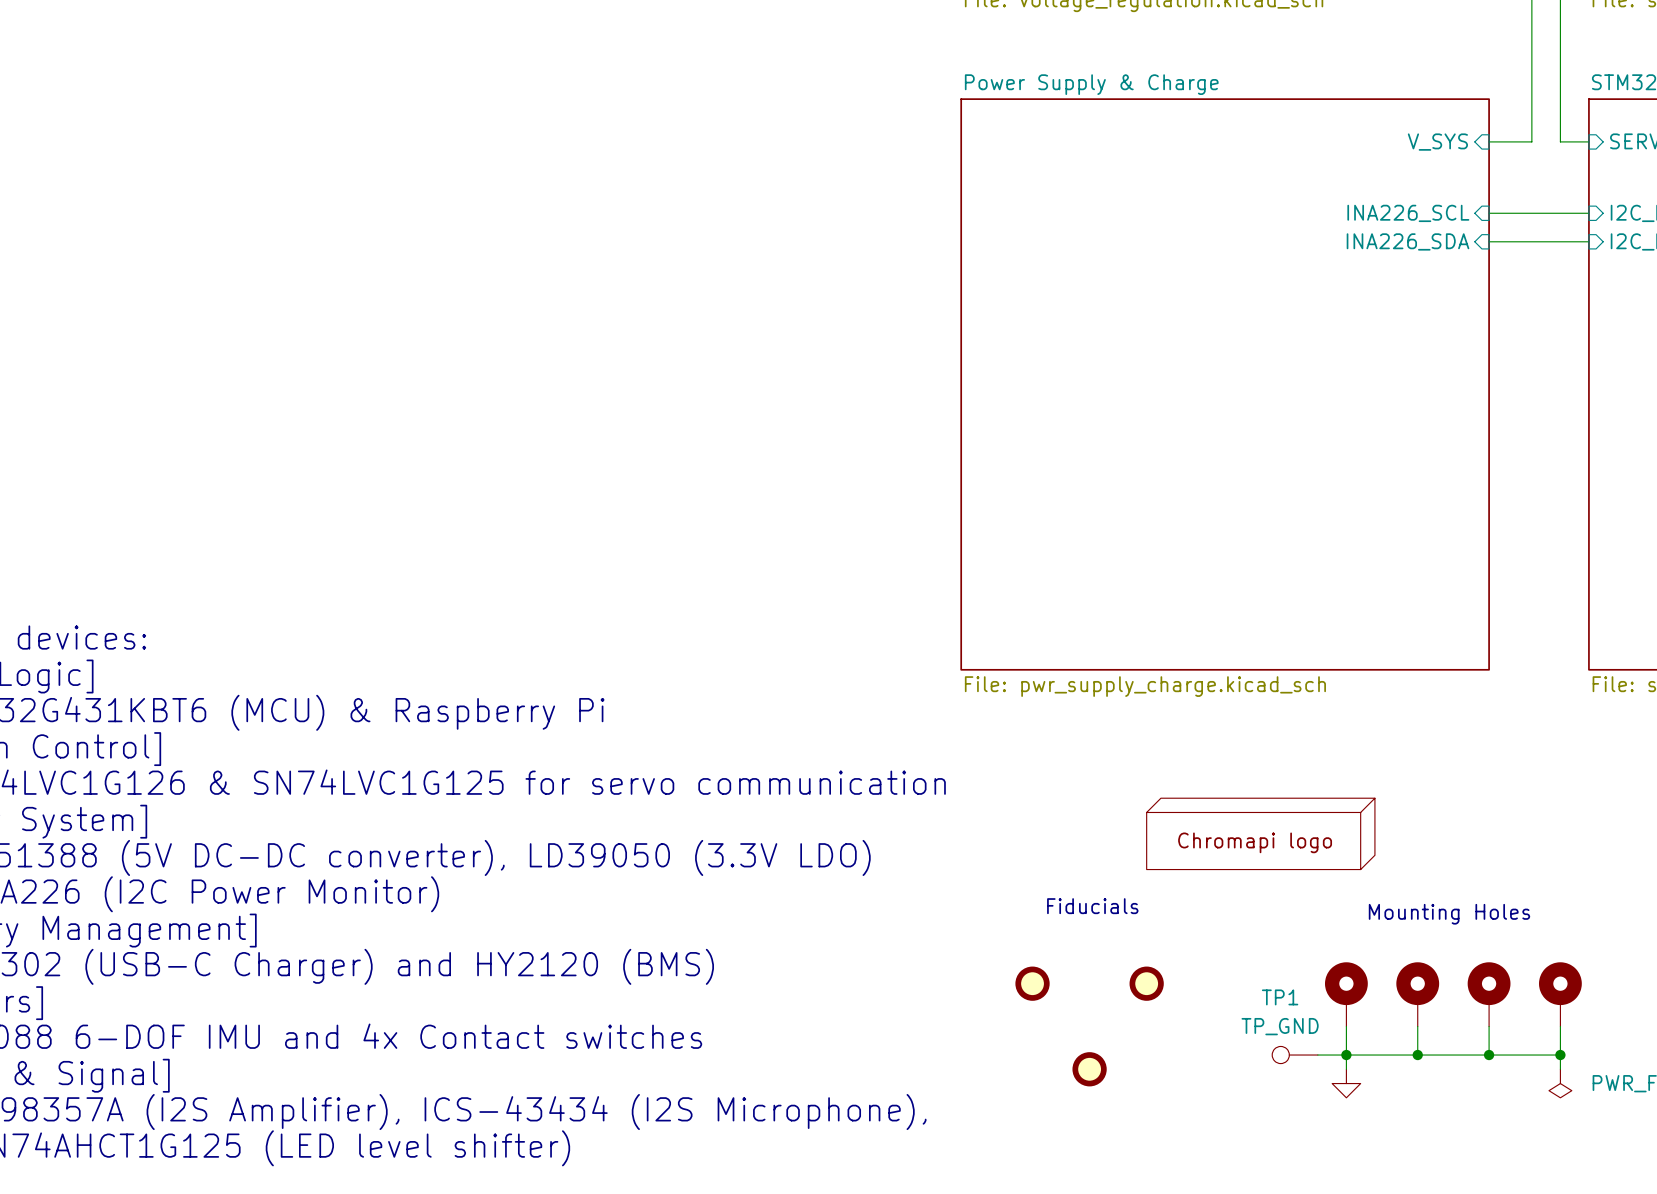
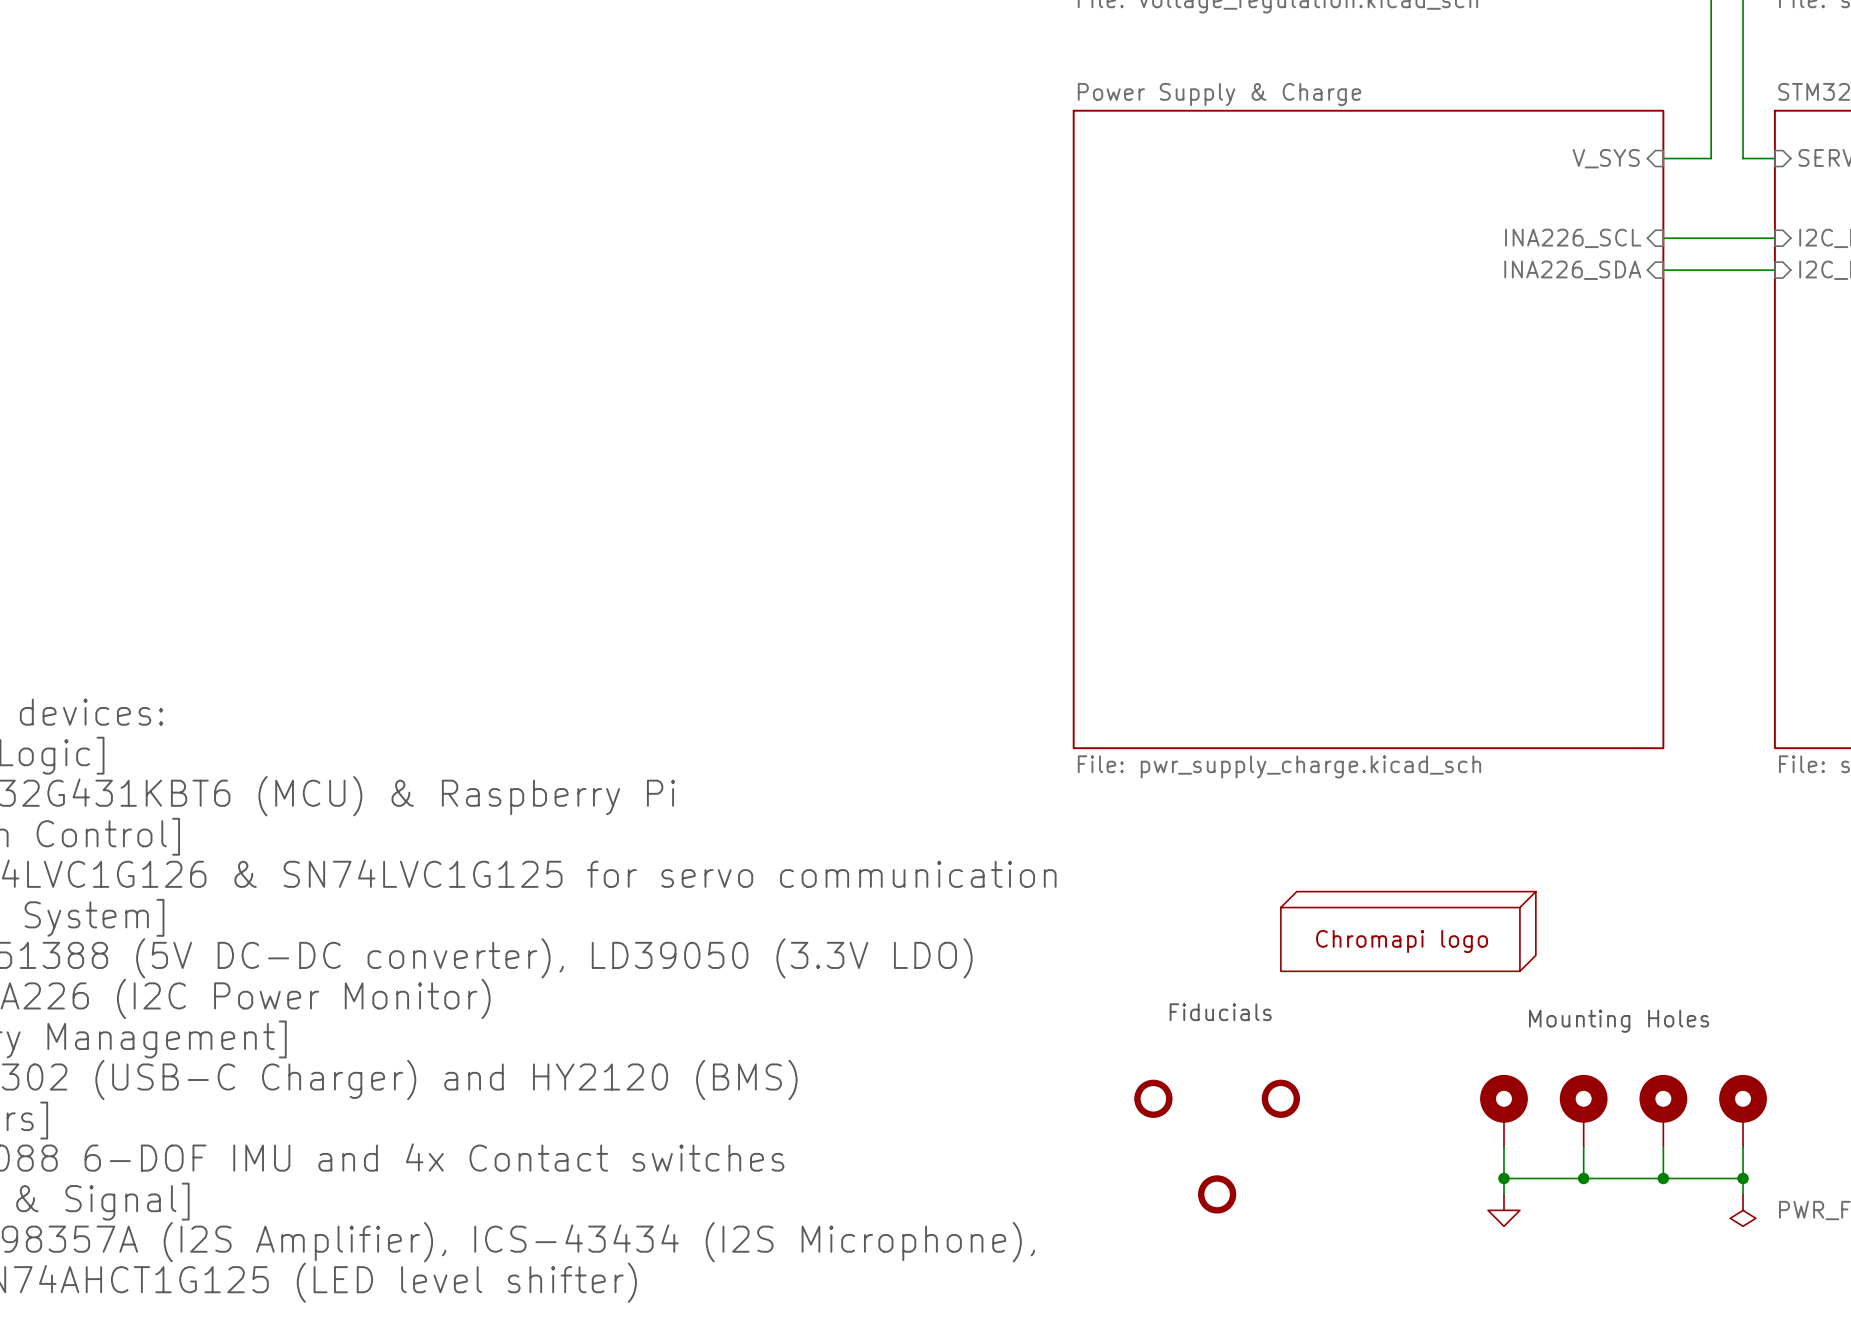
TP1: TP_GND (1295, 1055) -> none
wire: (1317, 1055) (1346, 1055) -> none

